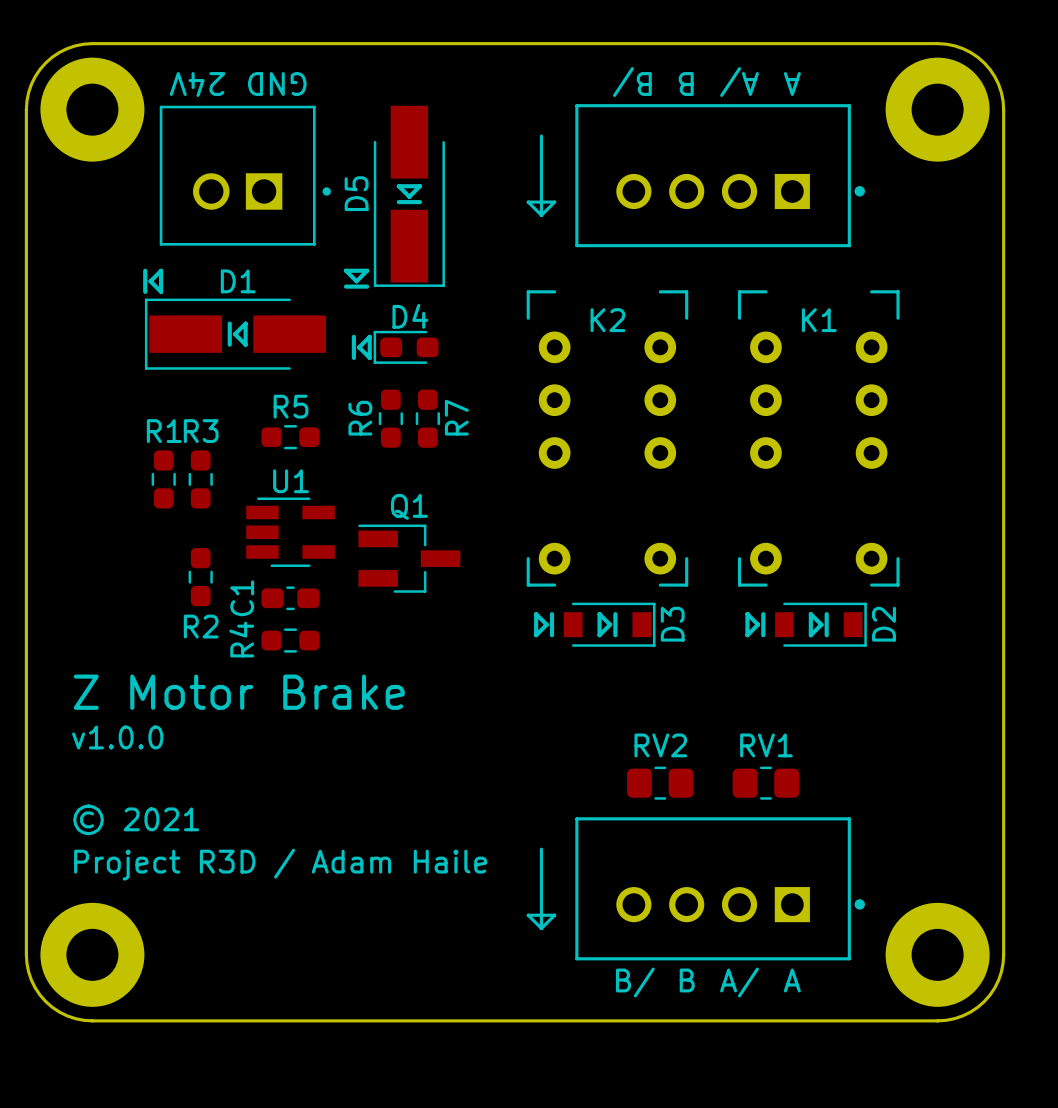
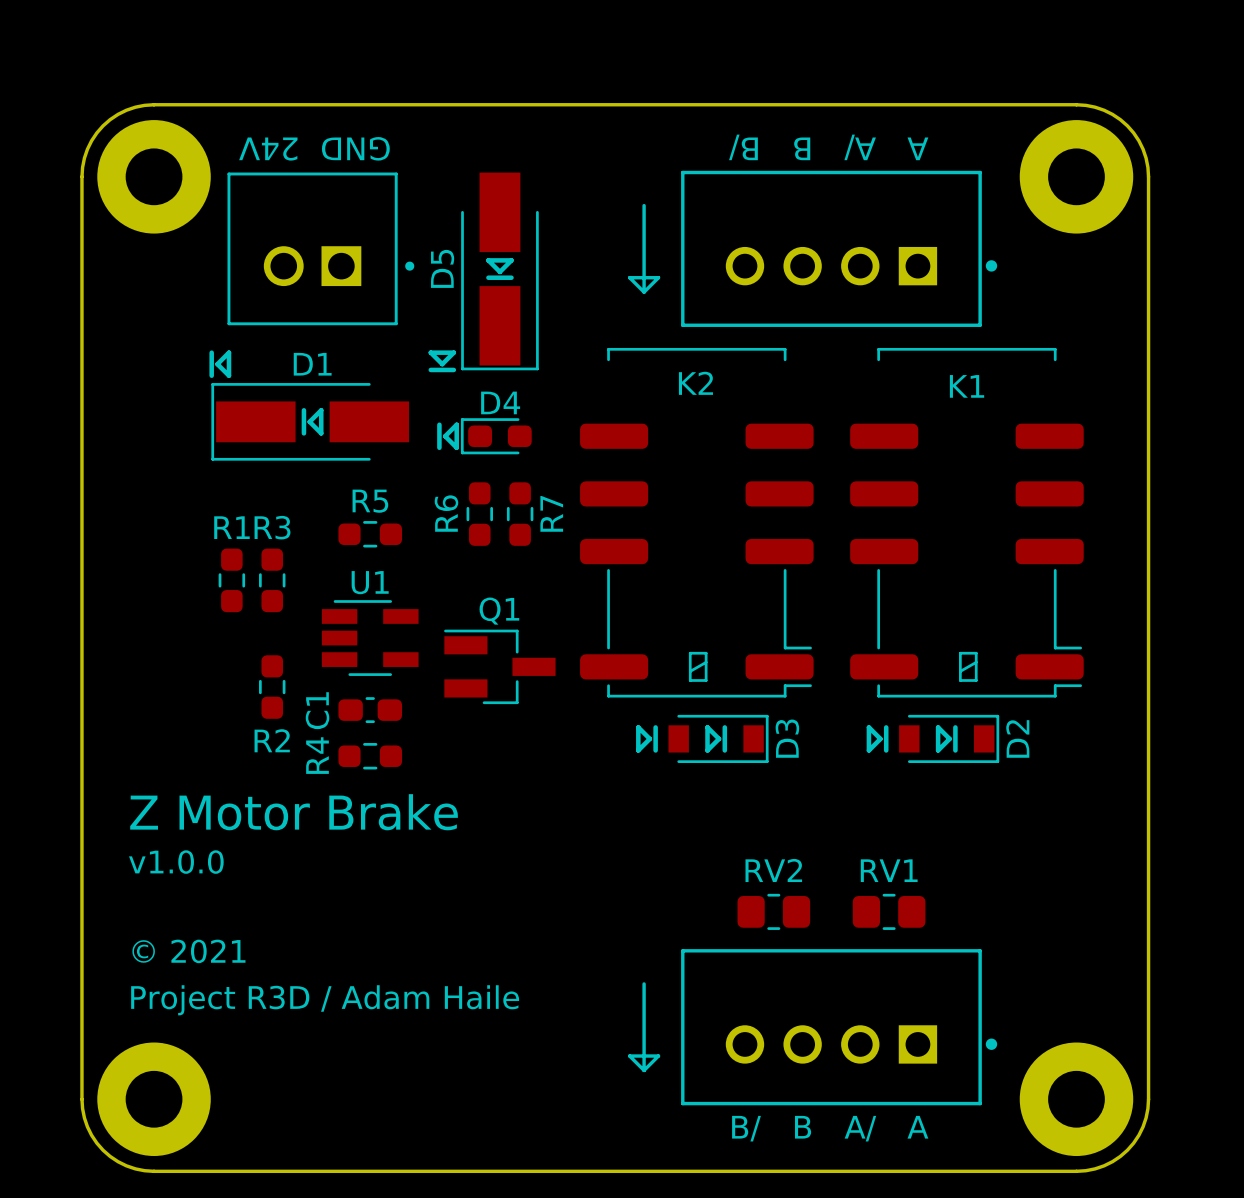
K2 footprint: [526, 290, 689, 587] -> [580, 347, 814, 698]
K1 footprint: [737, 290, 900, 587] -> [850, 347, 1084, 698]

